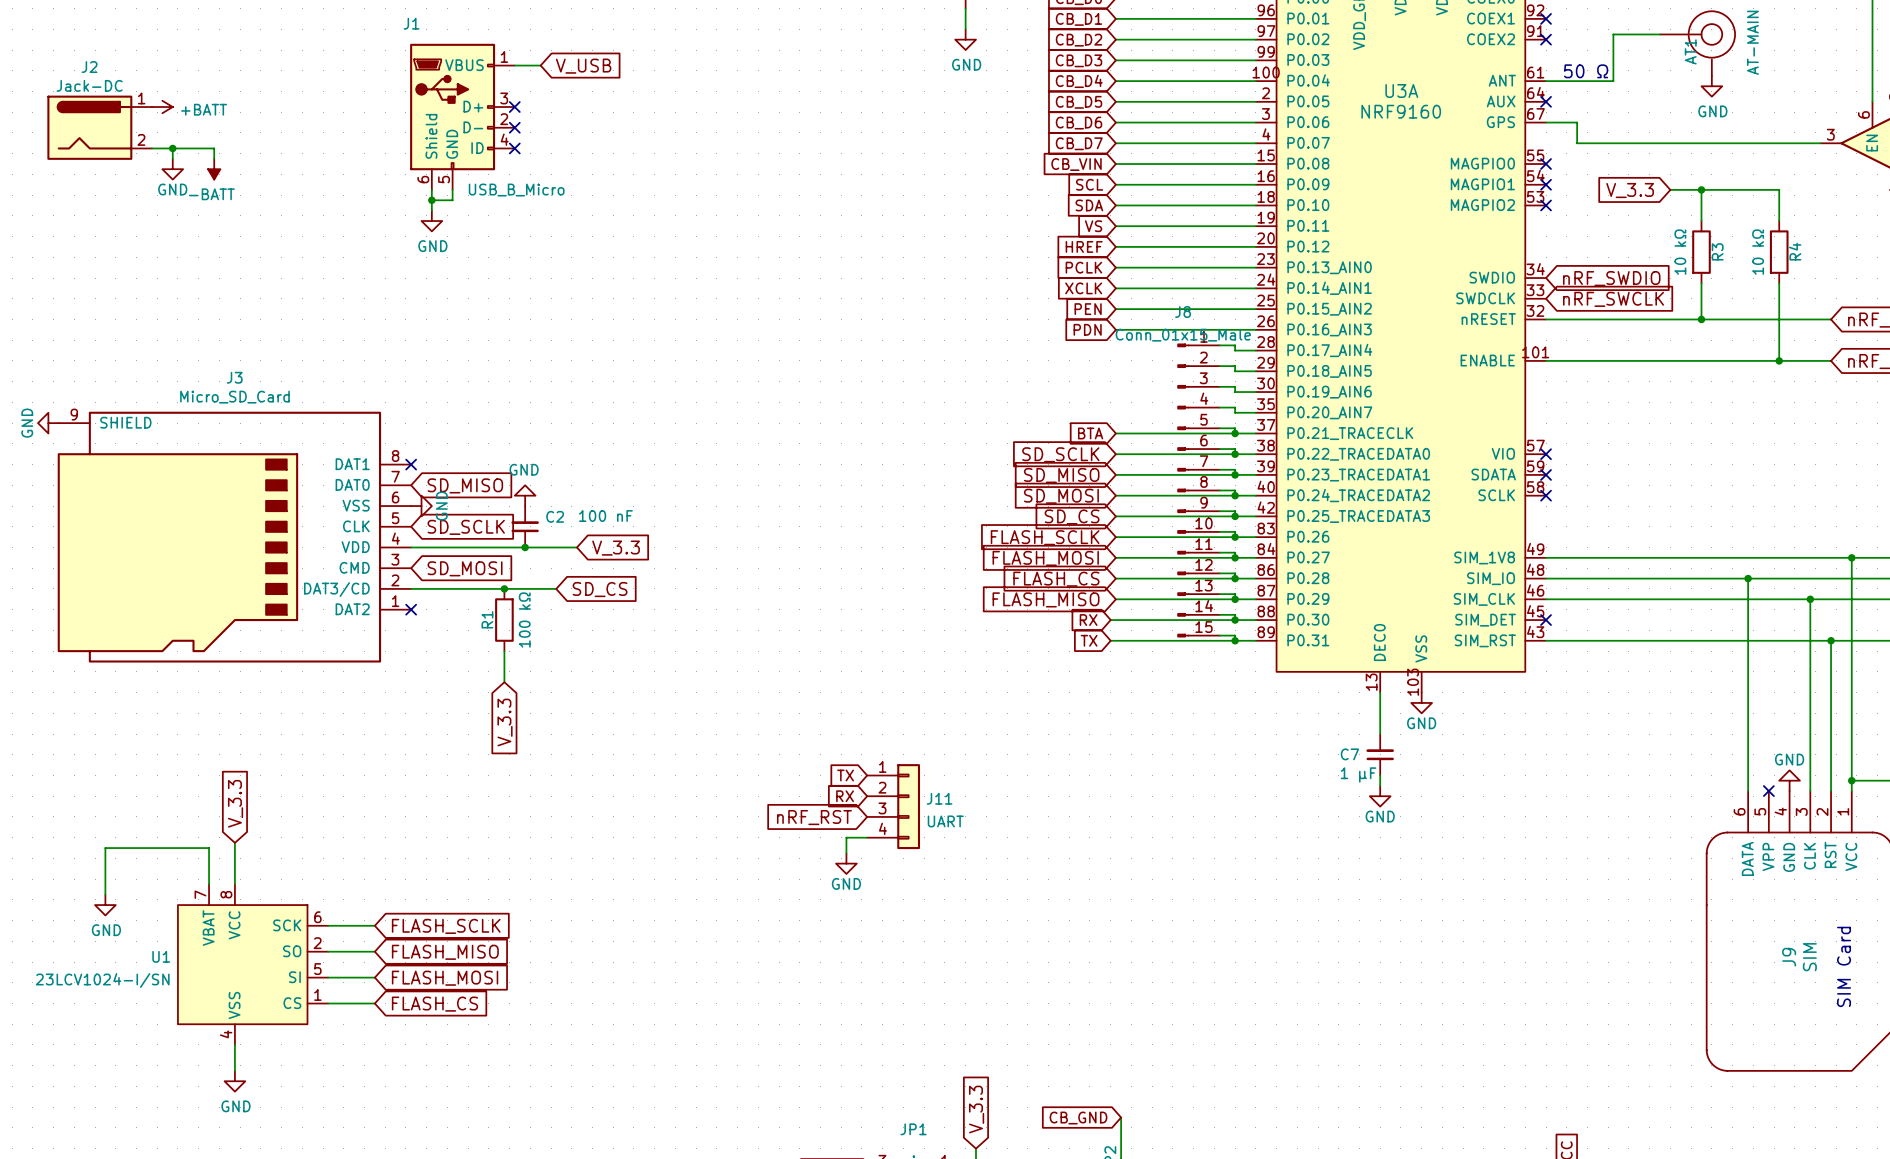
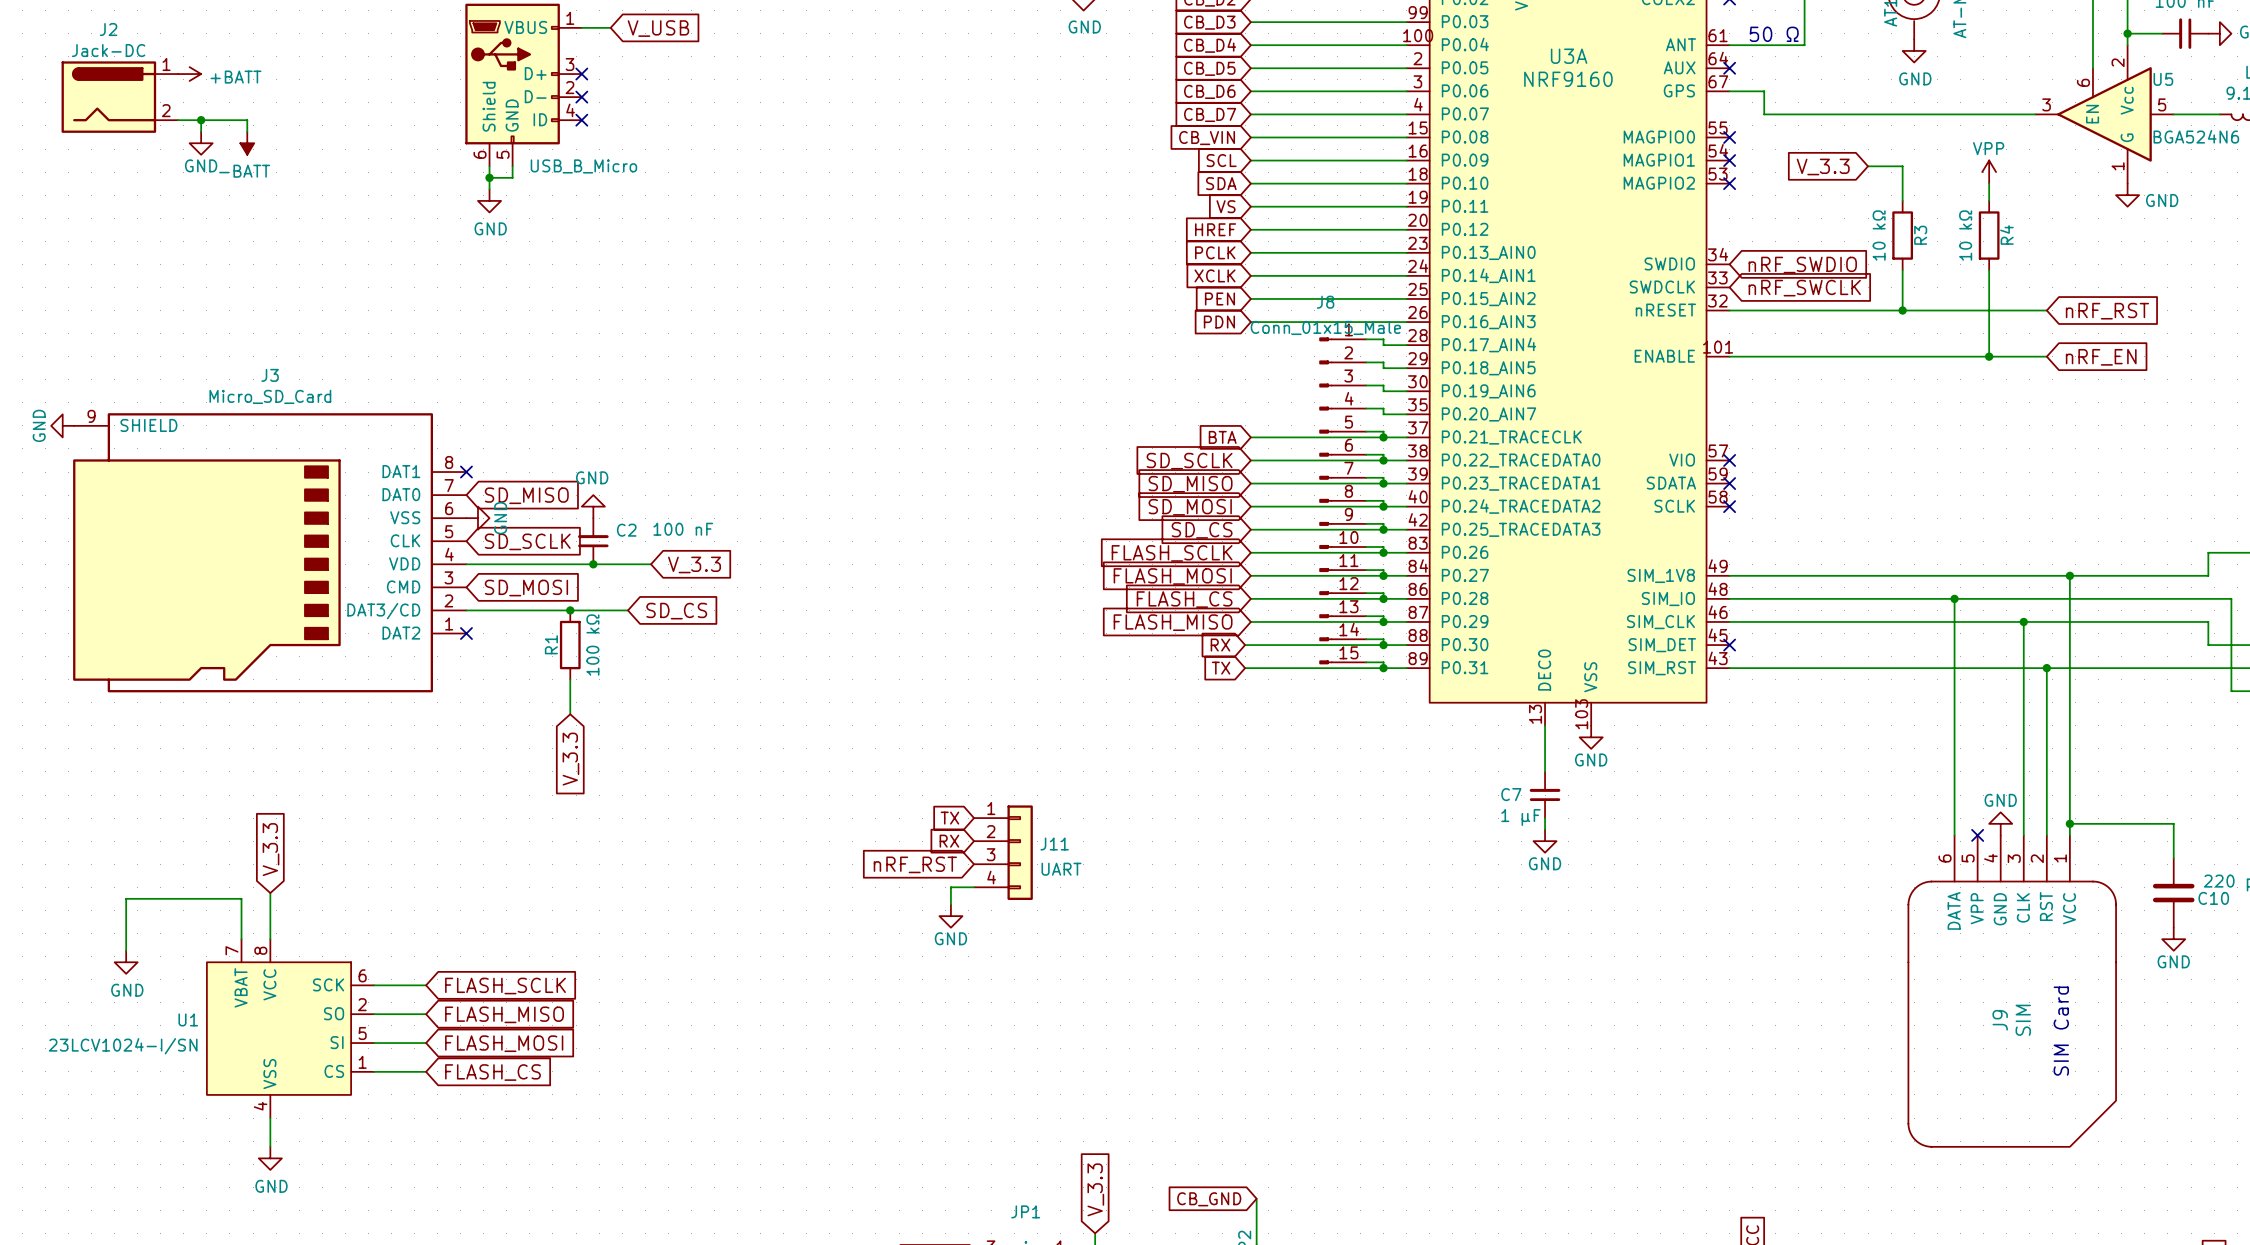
wire: (1701, 189) (1779, 189) (1779, 205) -> none
junction: (1701, 189) -> none
power symbol: none -> VPP (1989, 172)

